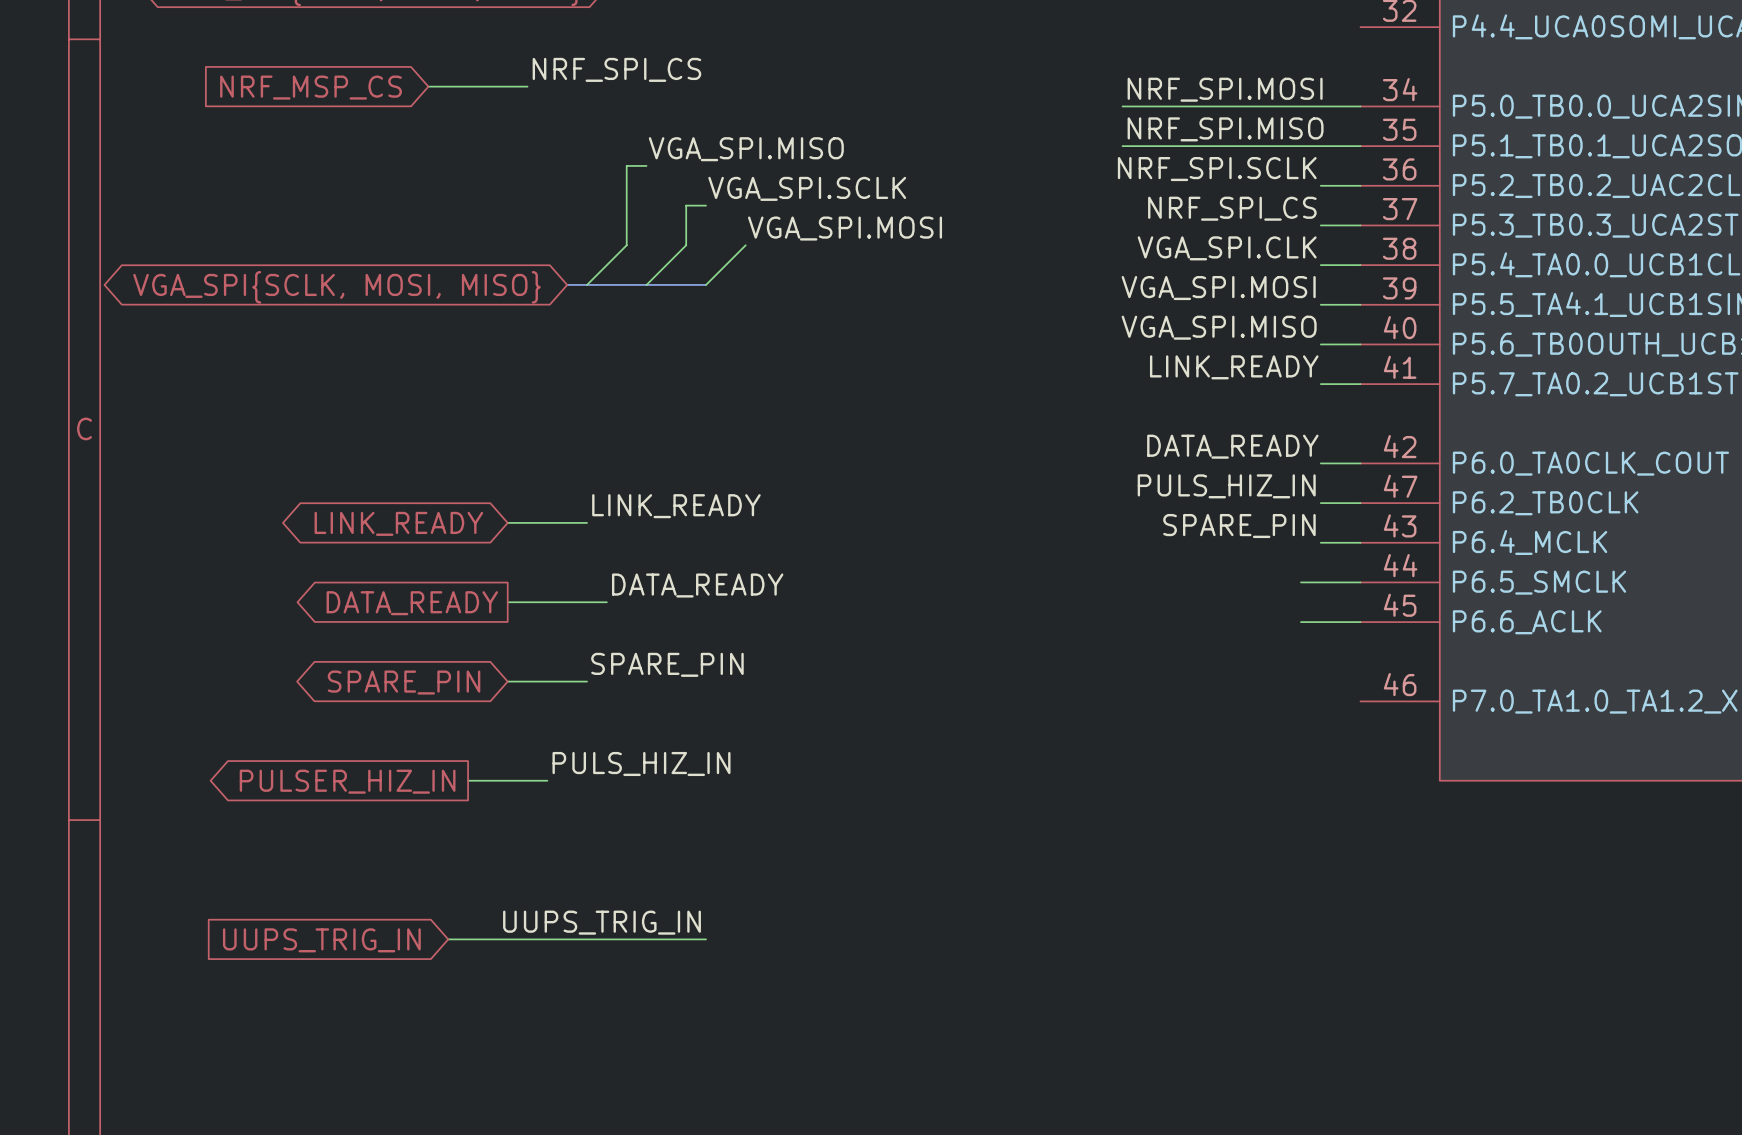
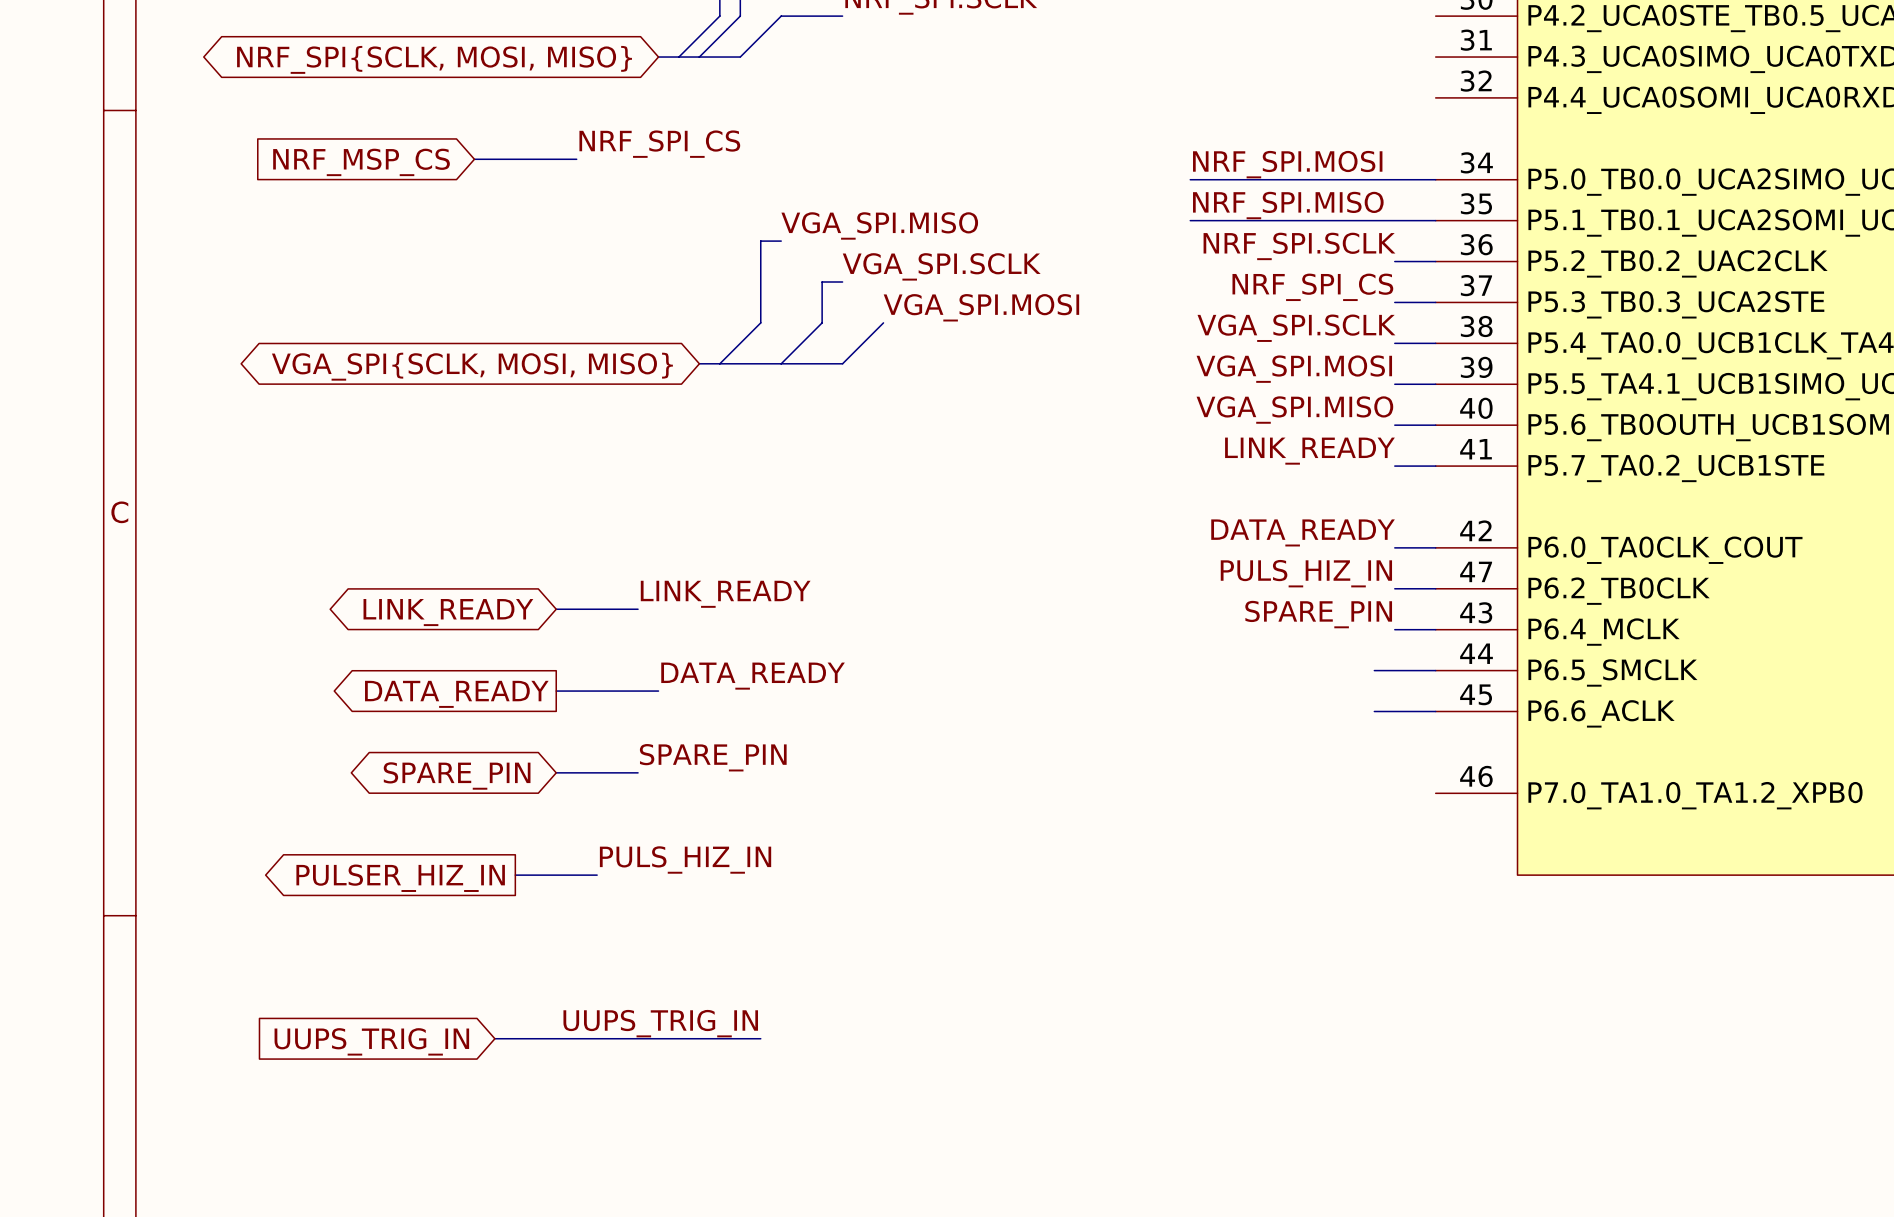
label position: VGA_SPI.MISO (746, 149) -> VGA_SPI.MISO (879, 225)
wire: (646, 165) (626, 165) (626, 245) (587, 284) -> (781, 241) (760, 241) (760, 322) (719, 363)
label position: VGA_SPI.SCLK (807, 188) -> VGA_SPI.SCLK (941, 266)
wire: (706, 205) (686, 205) (686, 245) (646, 284) -> (842, 281) (822, 281) (822, 322) (781, 363)
label position: VGA_SPI.MOSI (845, 228) -> VGA_SPI.MOSI (981, 307)
wire: (745, 245) (706, 284) -> (883, 322) (842, 363)
label: VGA_SPI.CLK (1227, 248) -> VGA_SPI.SCLK (1296, 328)
bus: (567, 284) (646, 284) -> (760, 363) (842, 363)
global label position: VGA_SPI{SCLK, MOSI, MISO} (336, 287) -> VGA_SPI{SCLK, MOSI, MISO} (472, 366)

